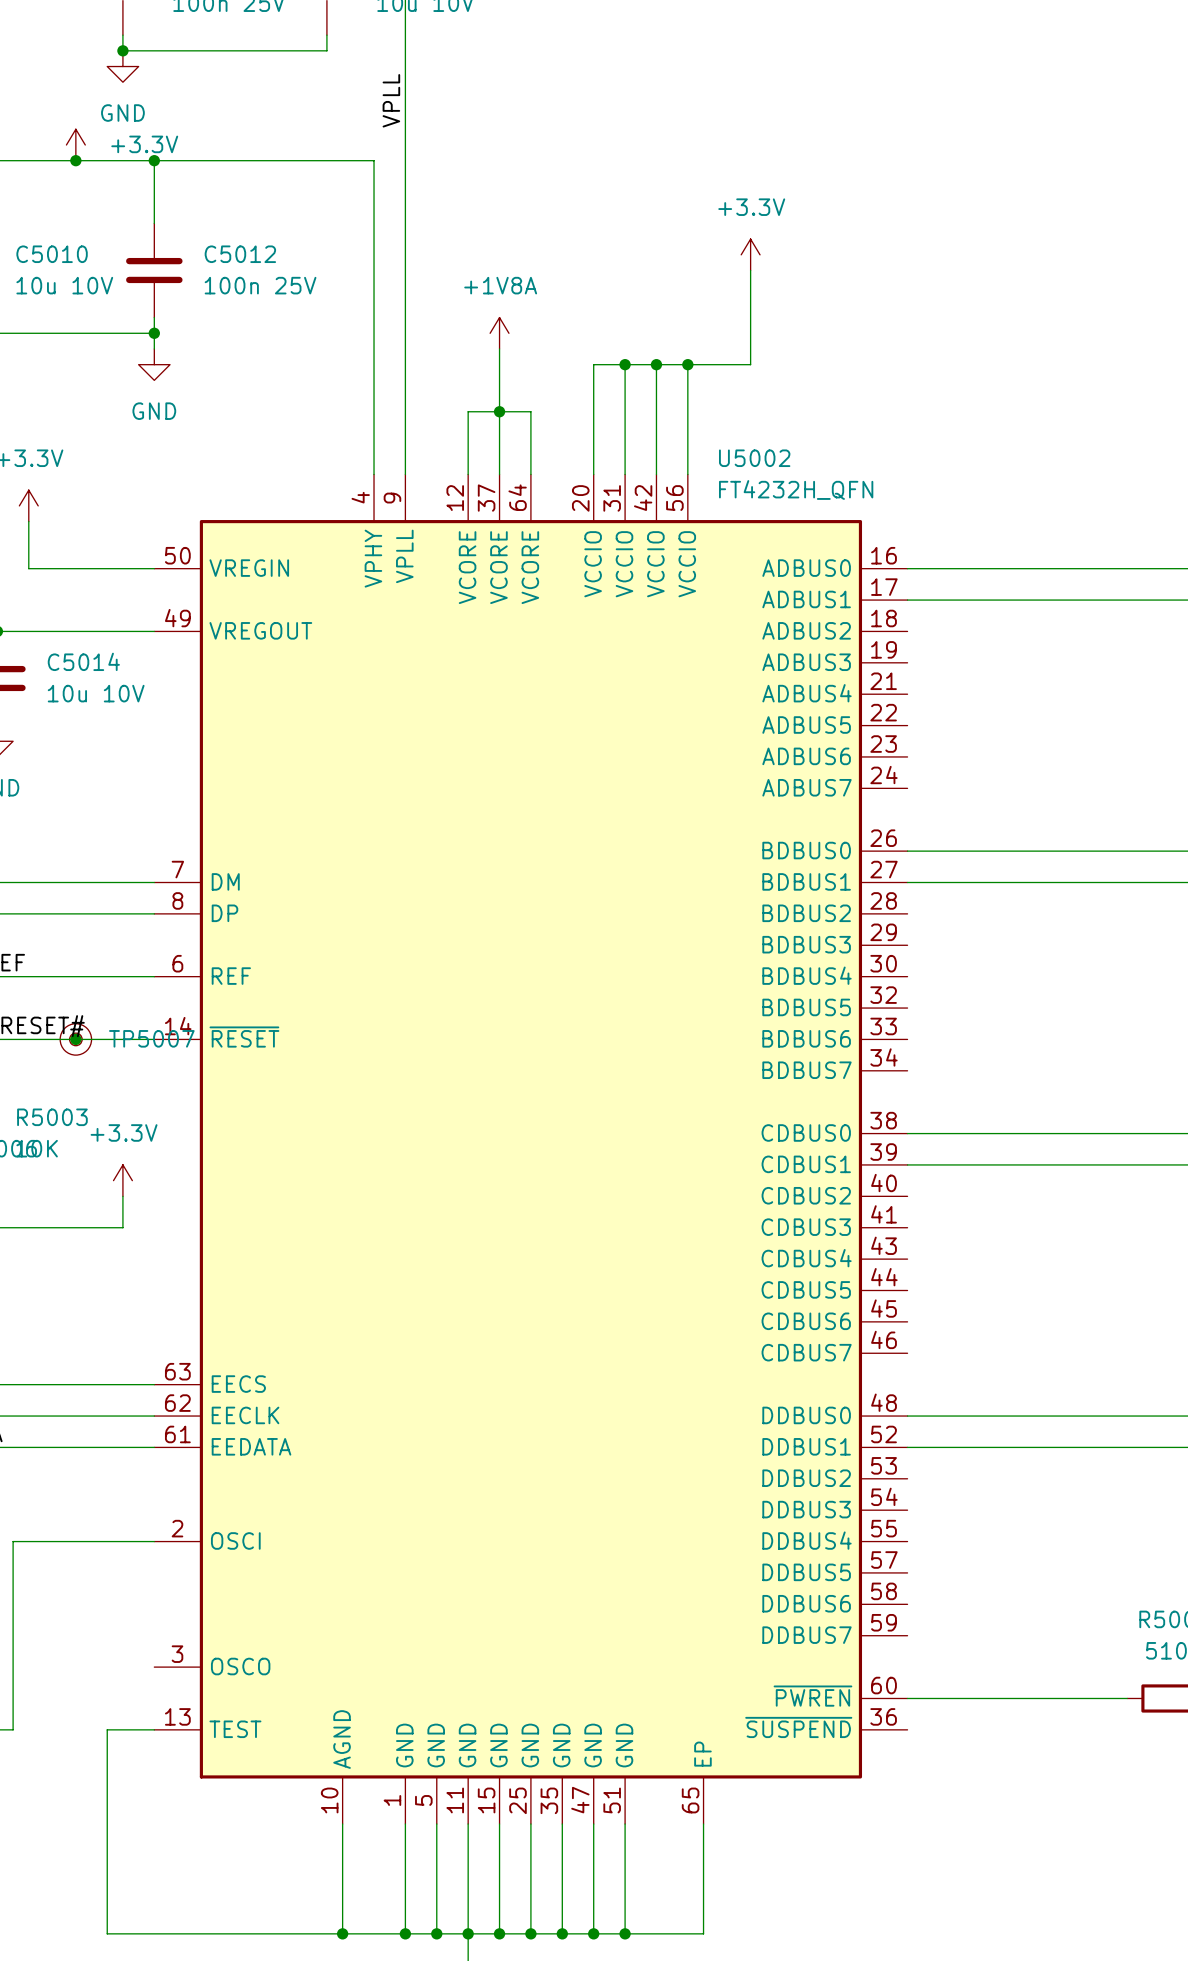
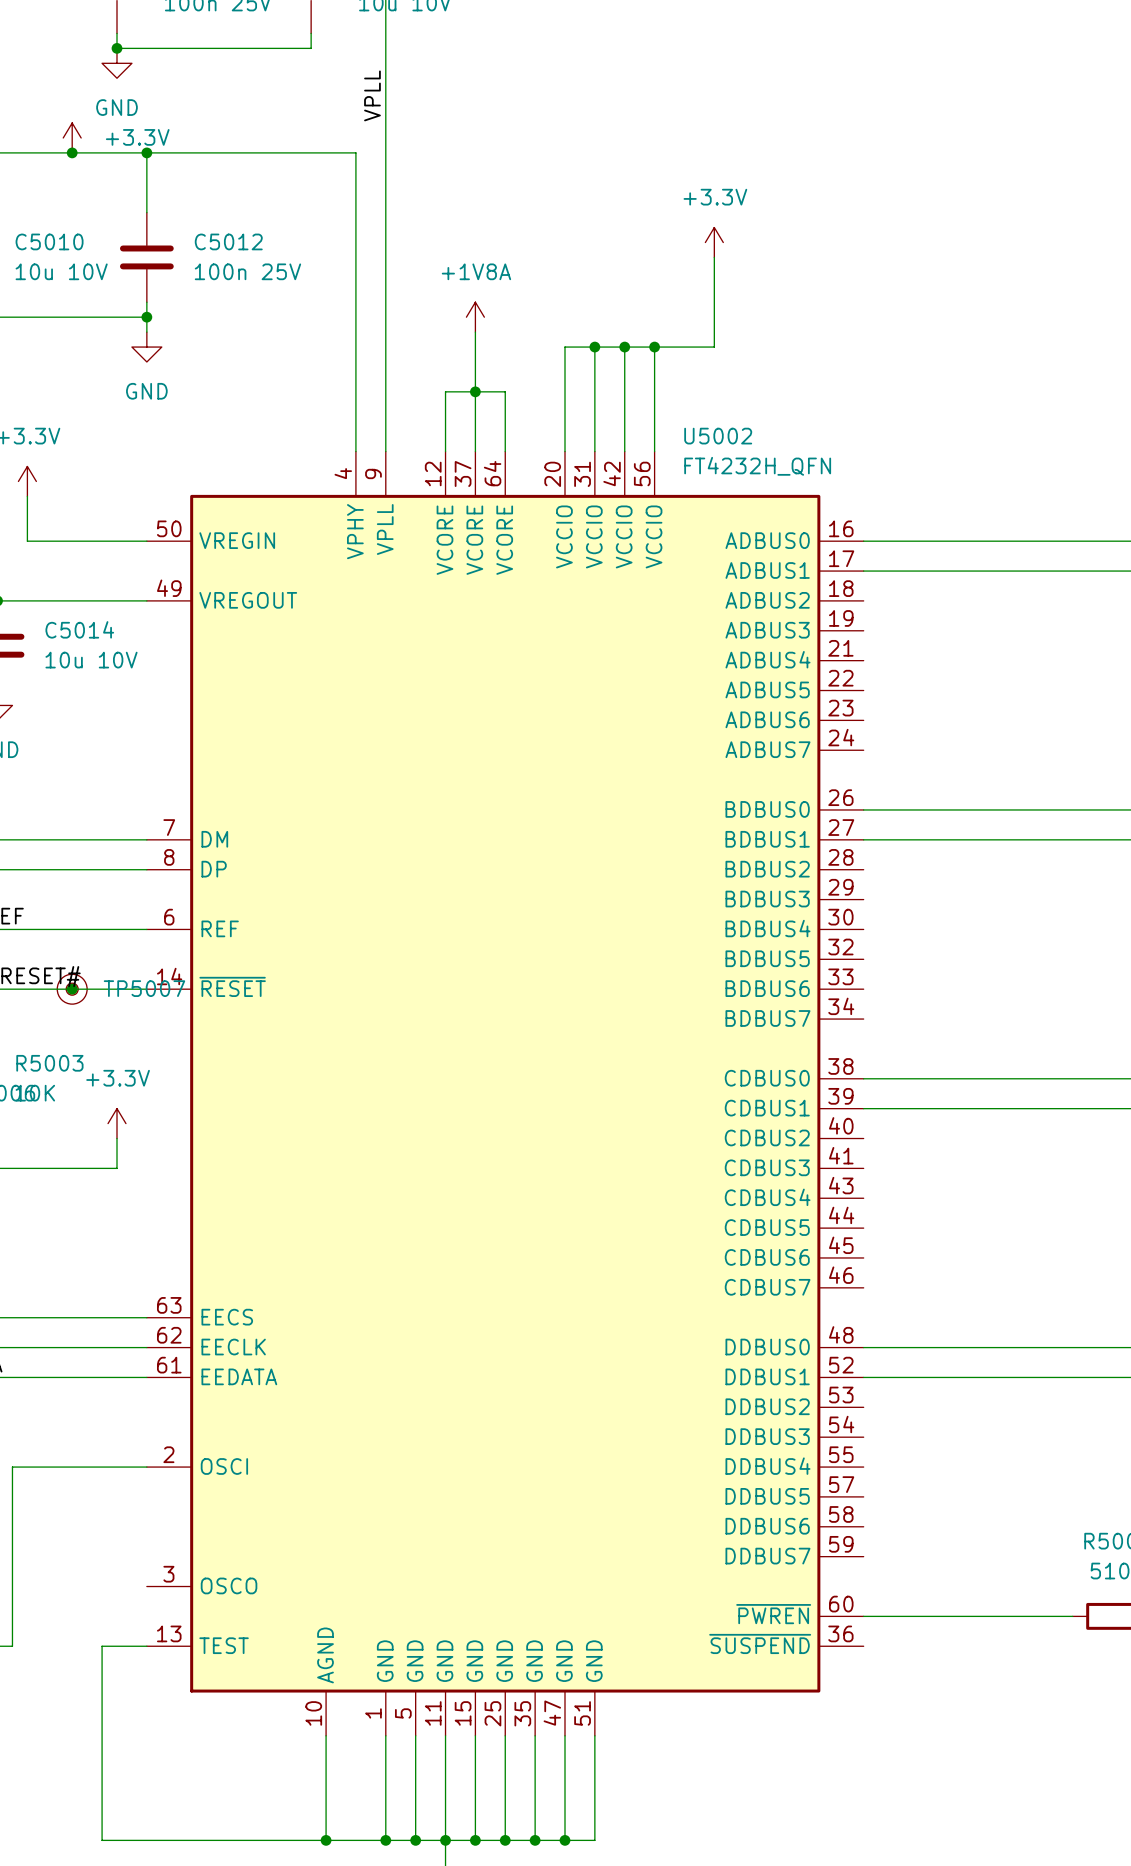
U5002 symbol: [154, 474, 908, 1825] -> [146, 451, 864, 1736]
wire: (703, 1824) (703, 1933) (625, 1933) -> none
junction: (625, 1933) -> none

